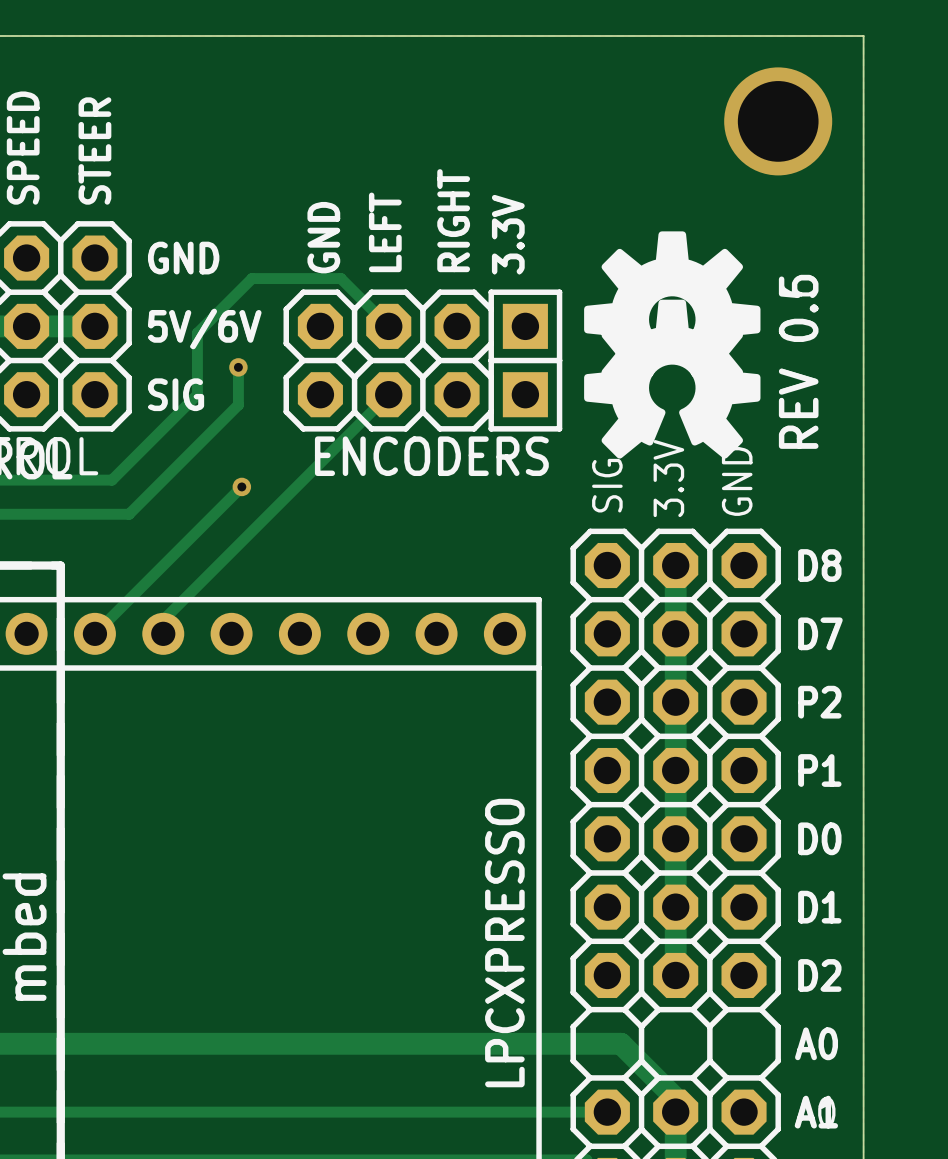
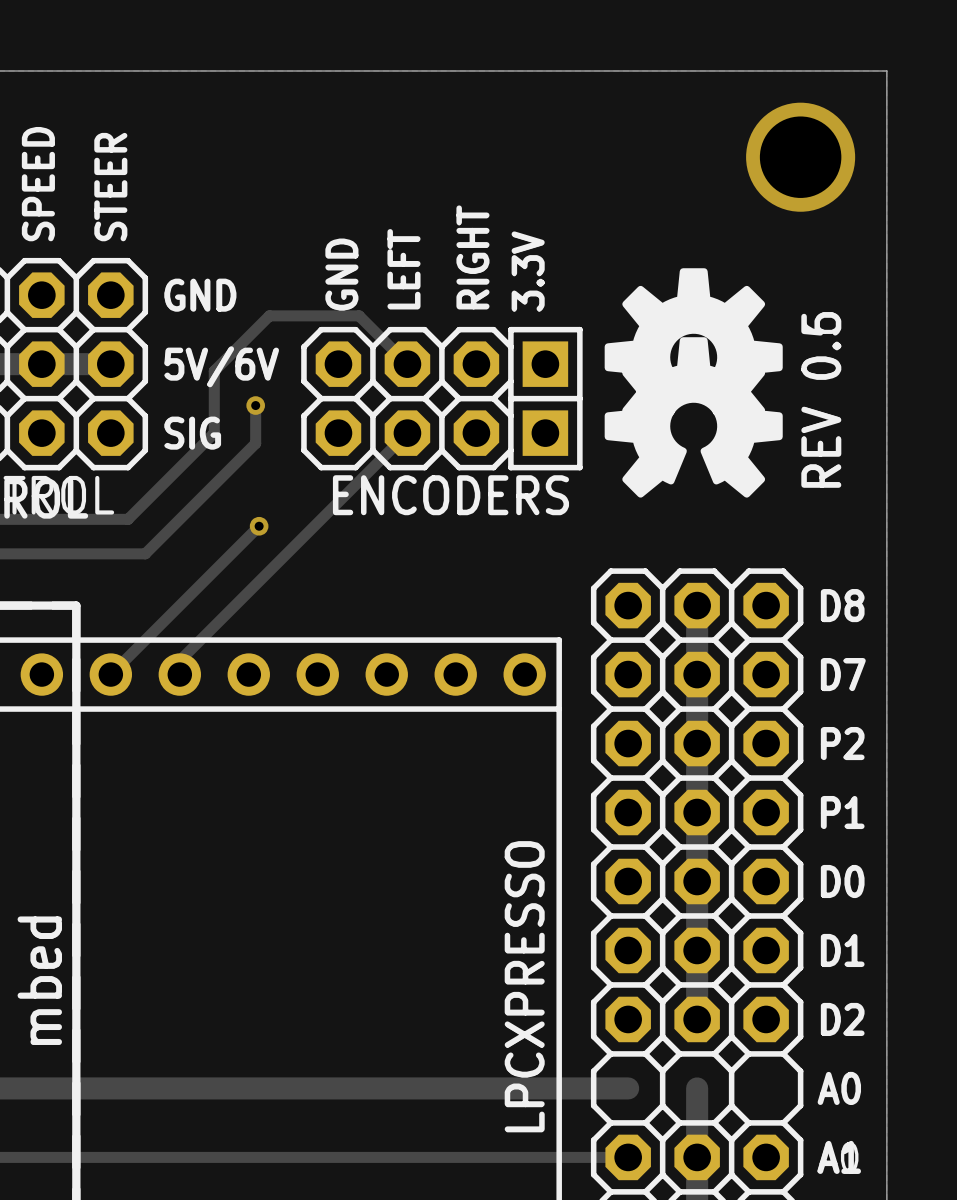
text: 3.3V (668, 478) -> none
text: GND (737, 481) -> none
text: SIG (607, 485) -> none
track: (607, 1043) (621, 1043) (675, 1098) -> (697, 1088) (697, 1143)

